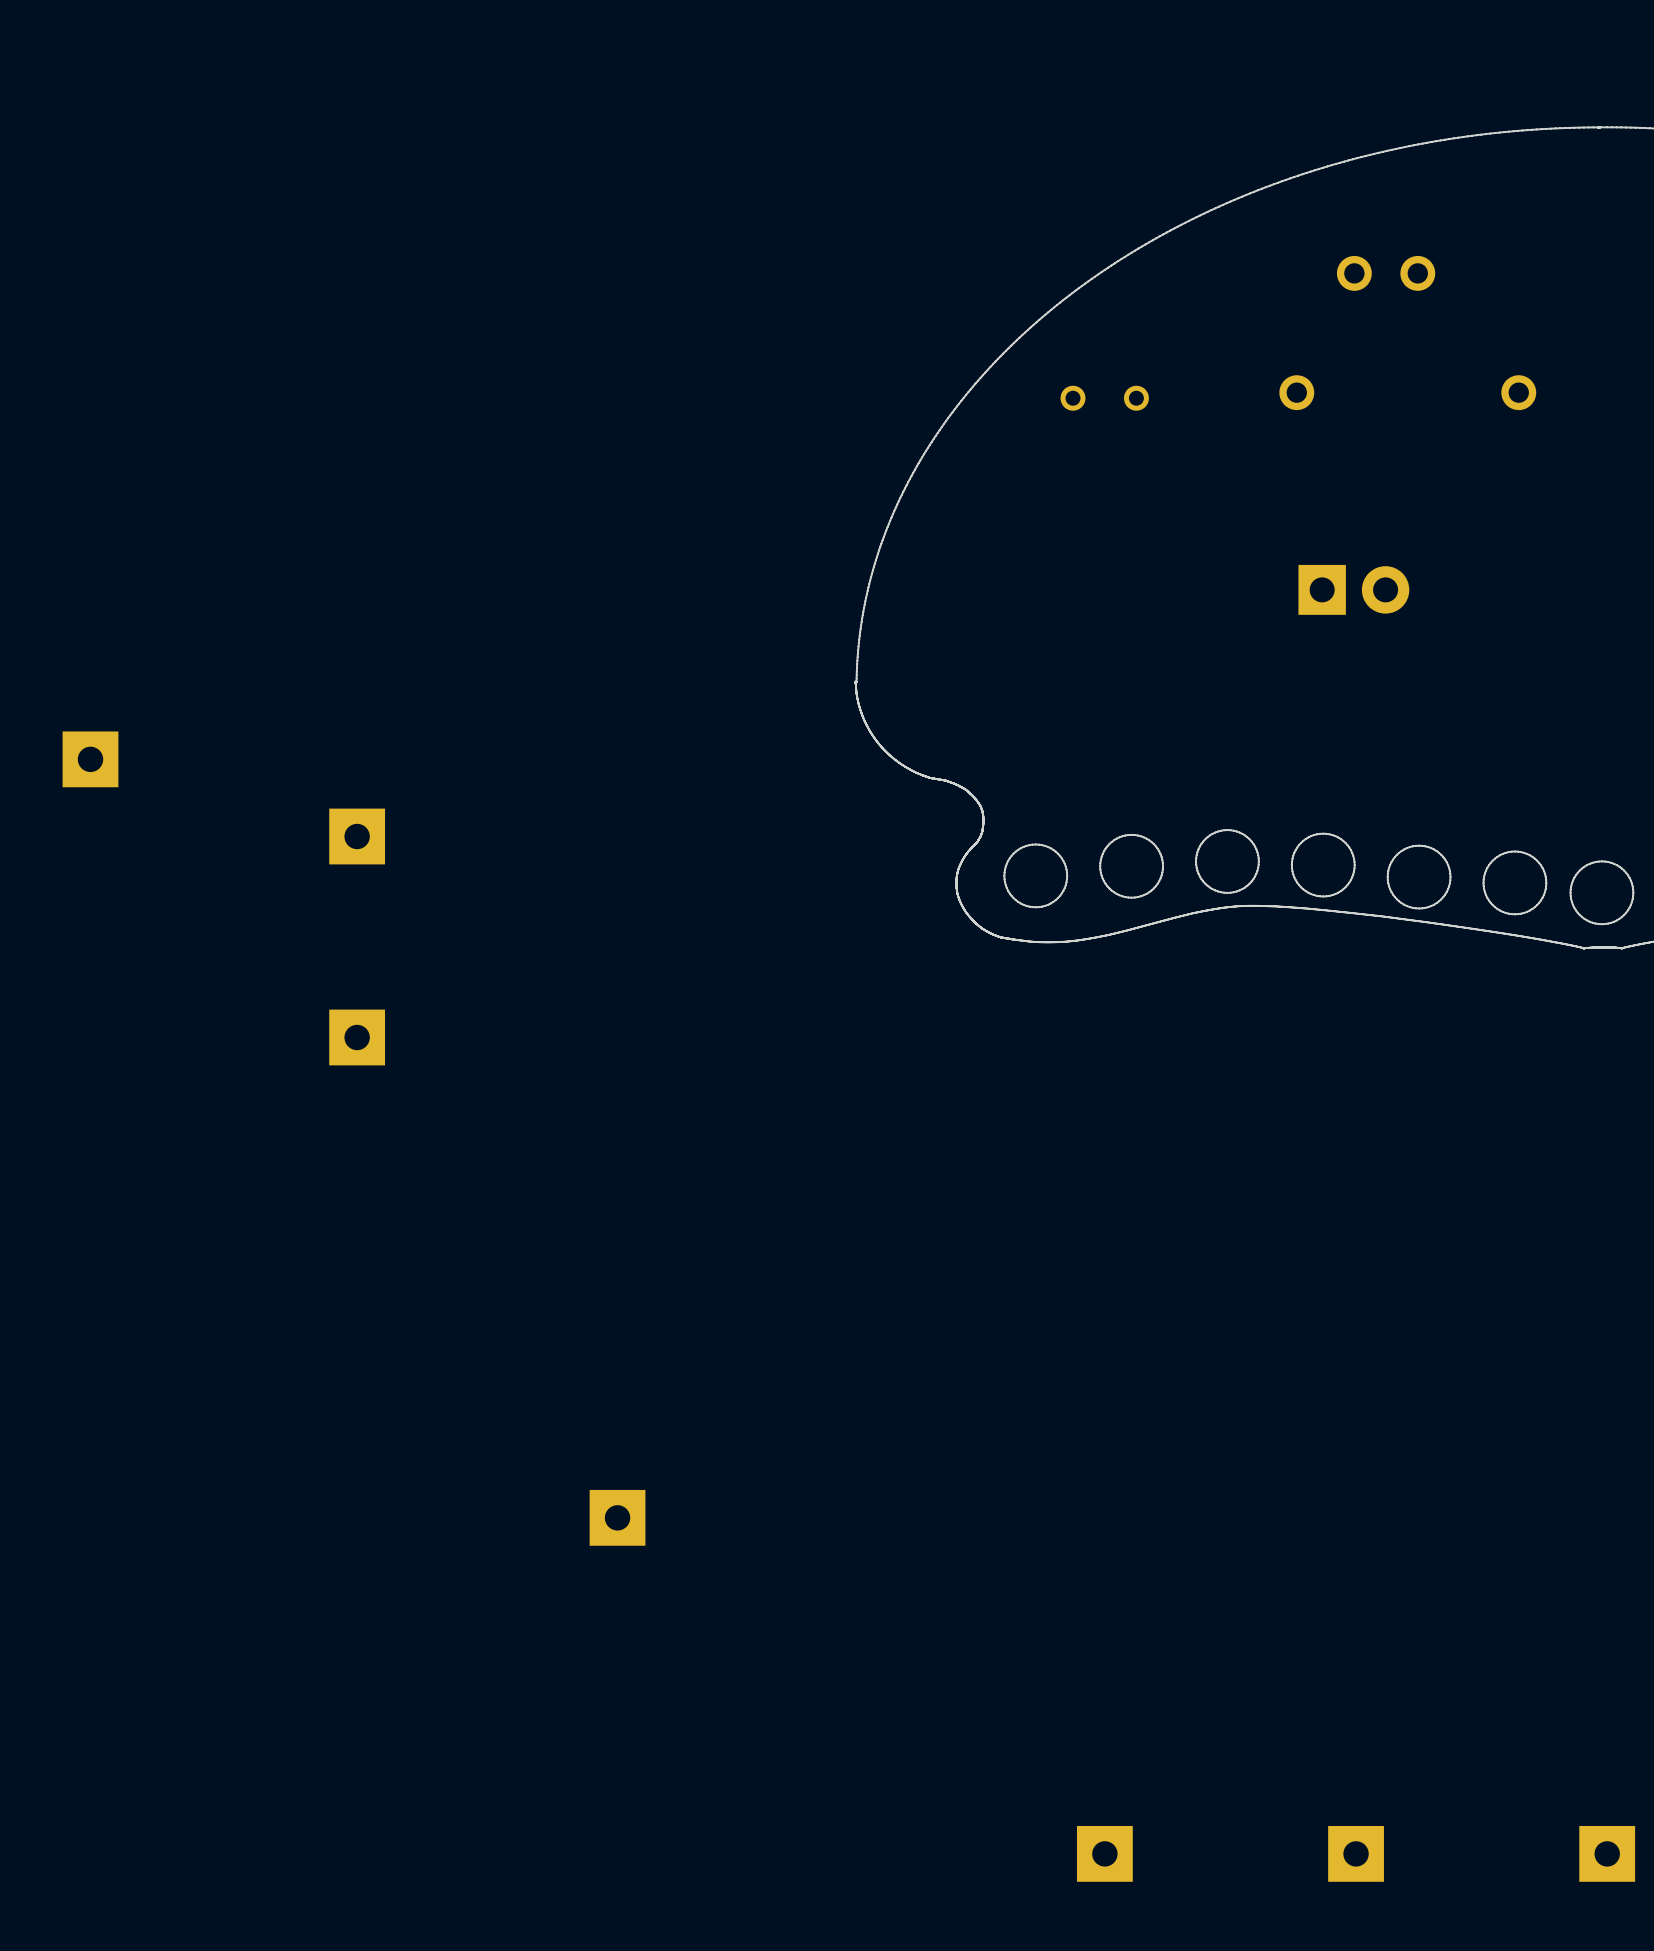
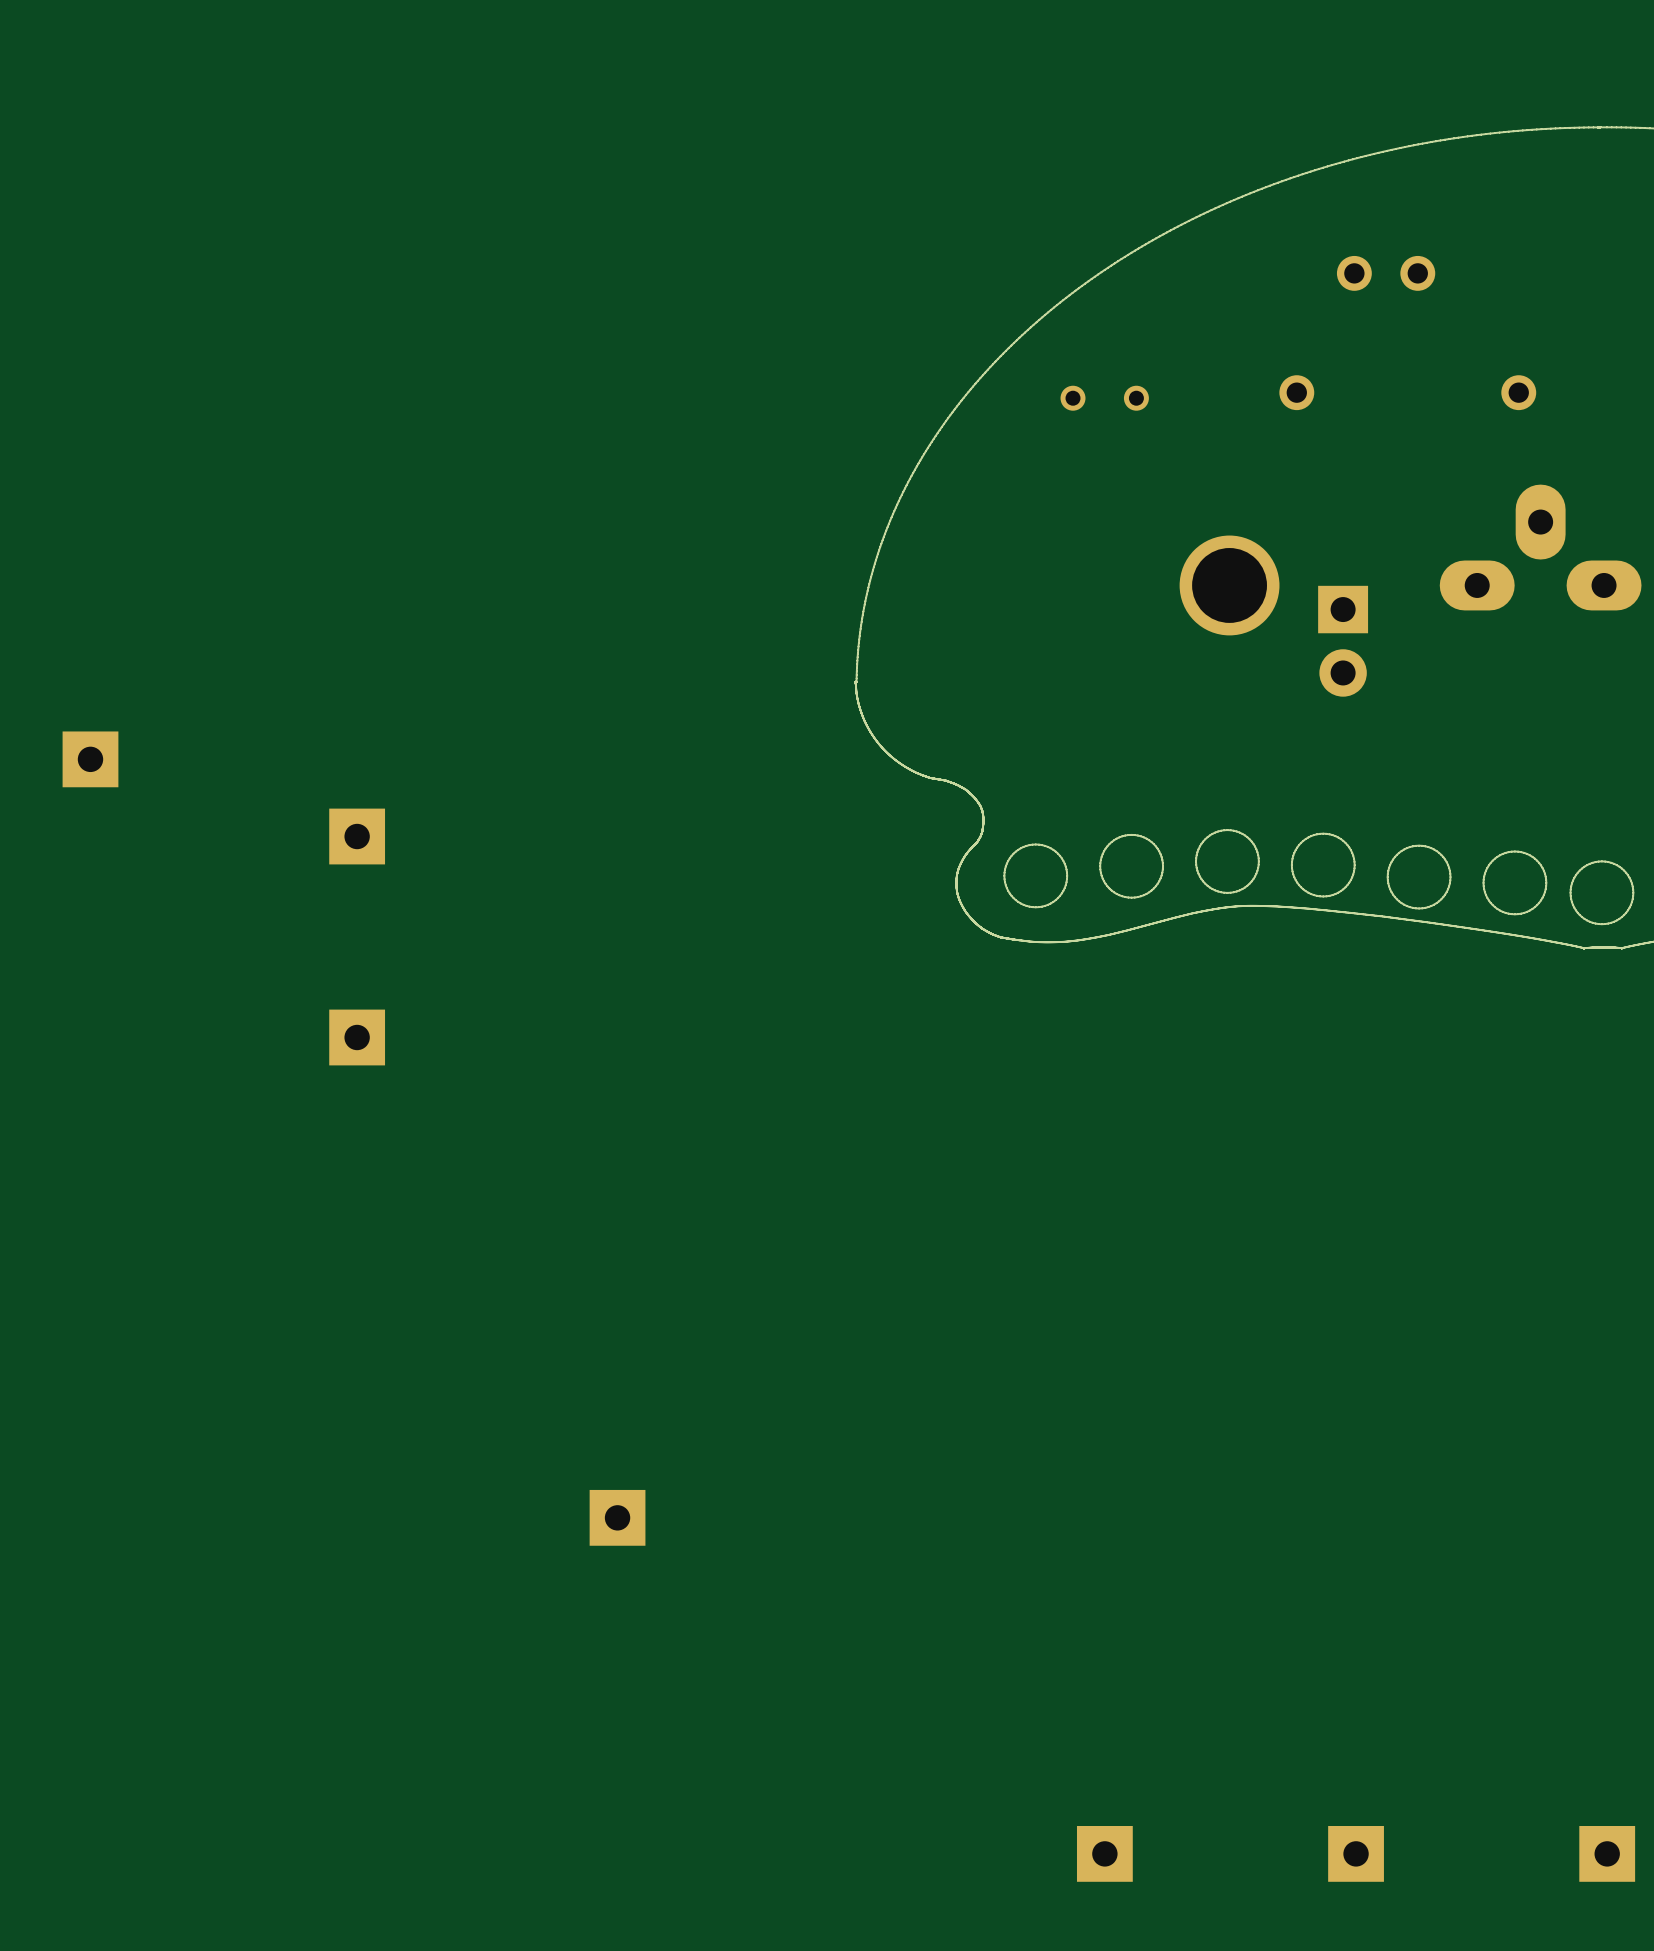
part: none -> (1540, 547)
part: none -> (1229, 585)
part rotation: 0° (1353, 589) -> 90° clockwise (1343, 641)

